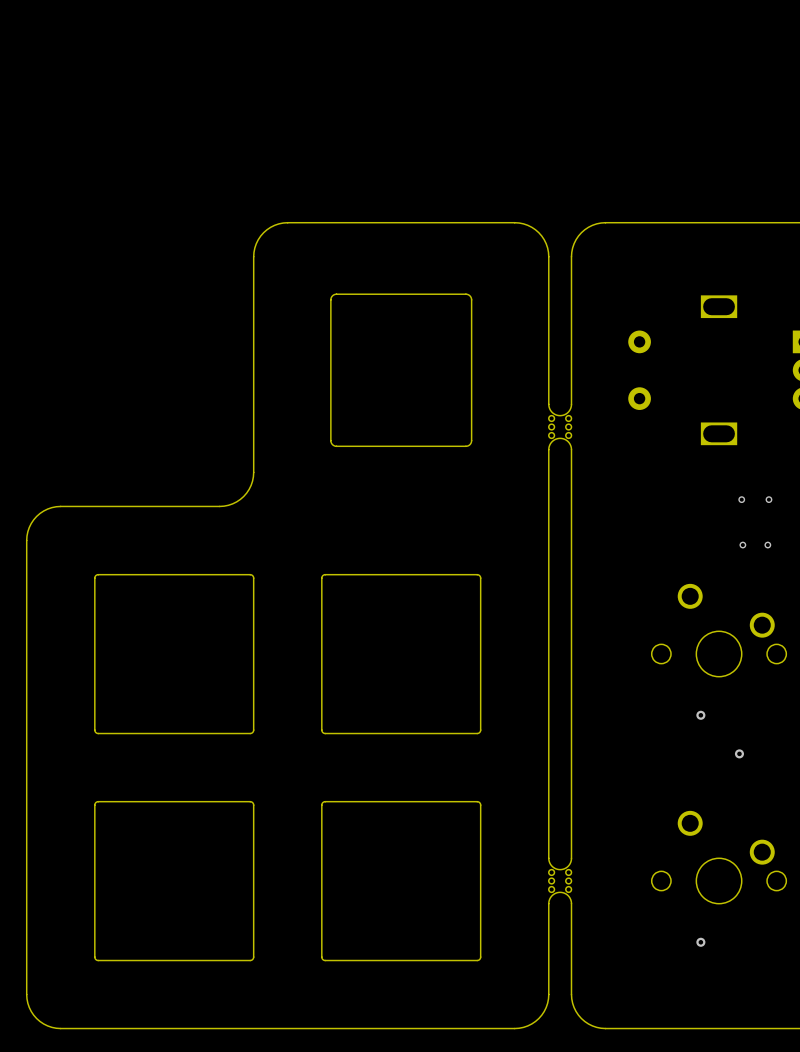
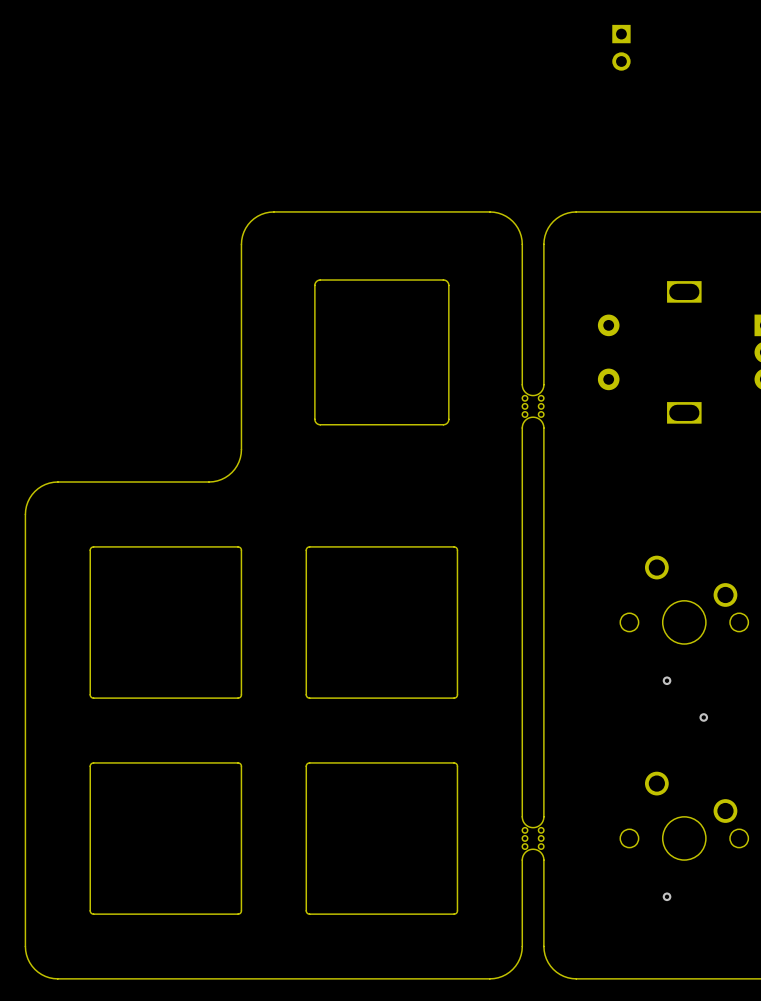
part: none -> (621, 47)
via: (741, 499) -> none
via: (768, 499) -> none
via: (742, 545) -> none
via: (767, 545) -> none

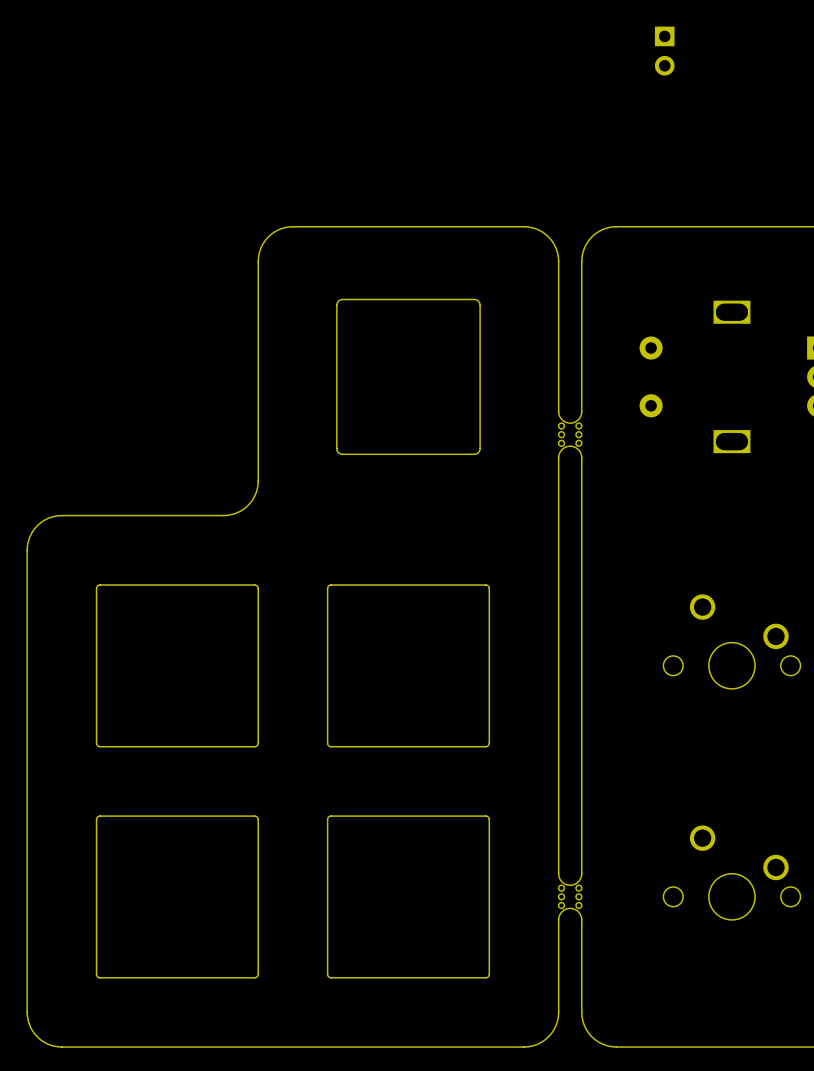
via: (667, 680) -> none
via: (703, 717) -> none
via: (667, 896) -> none

